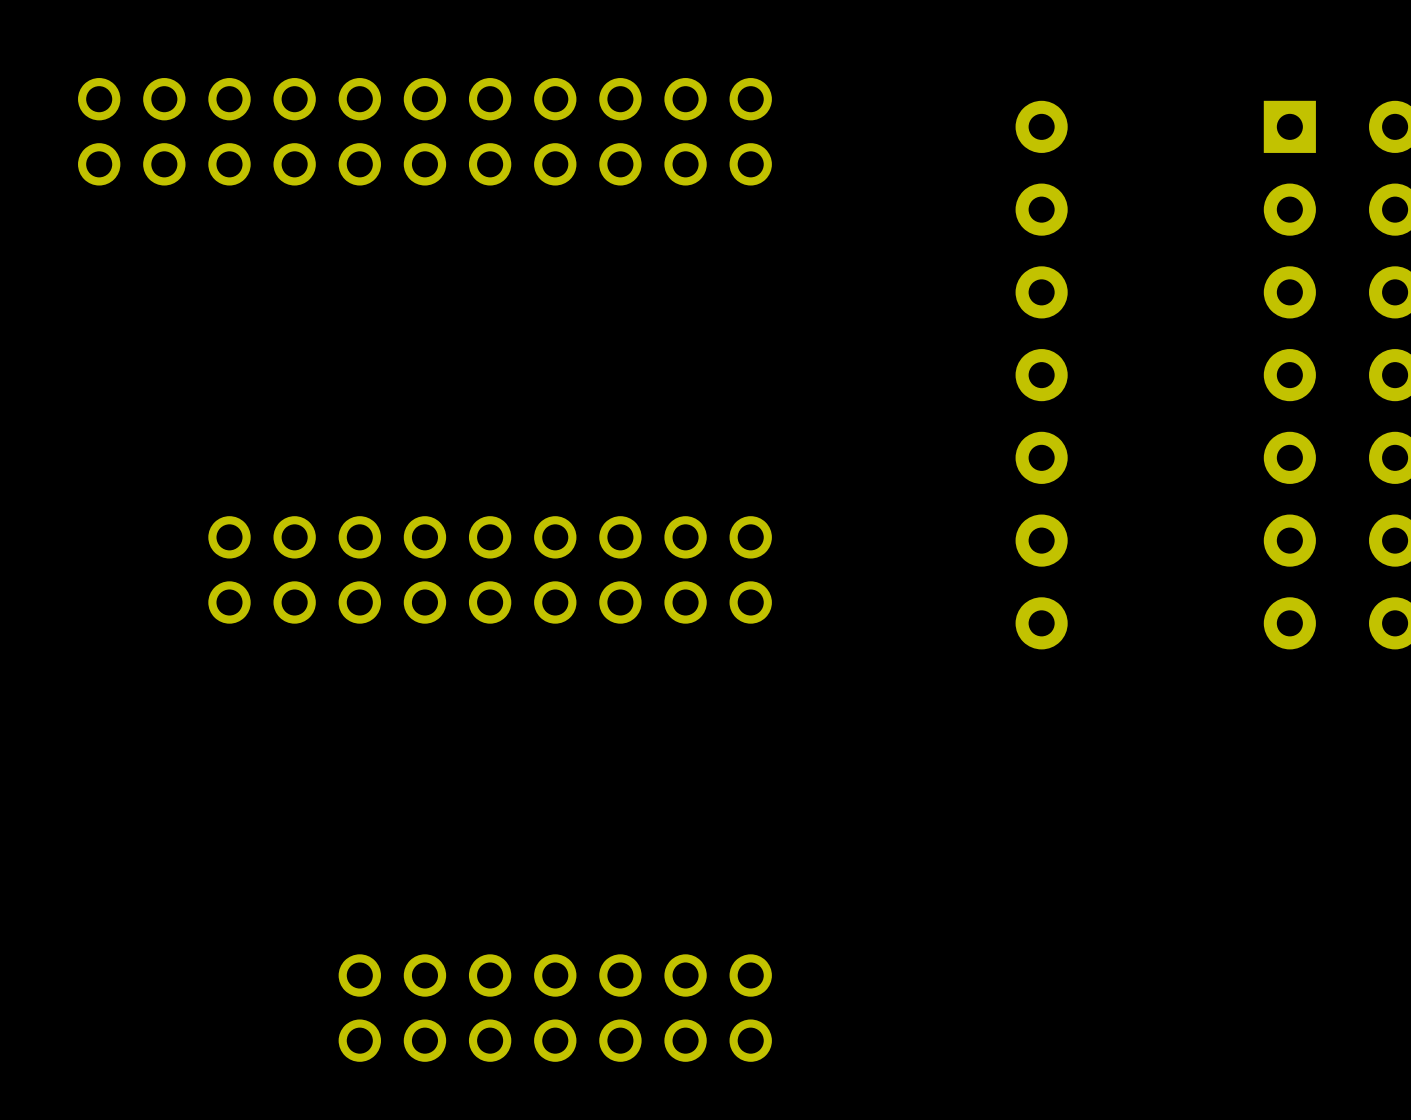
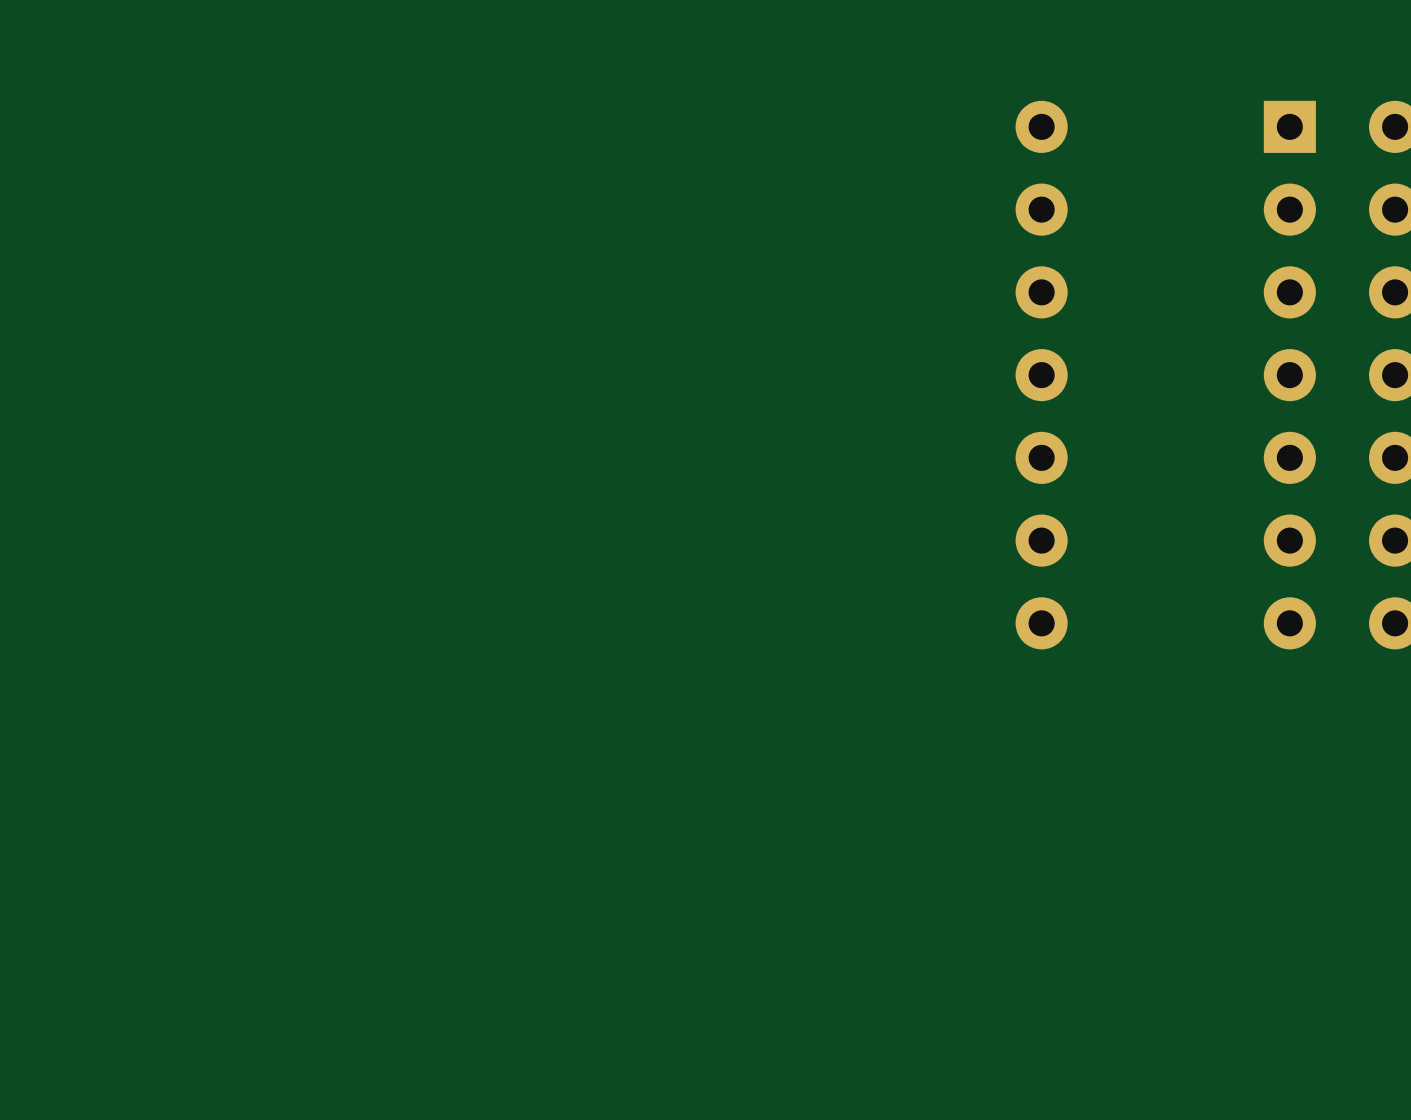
part: (424, 131) -> none
part: (490, 569) -> none
part: (555, 1008) -> none

